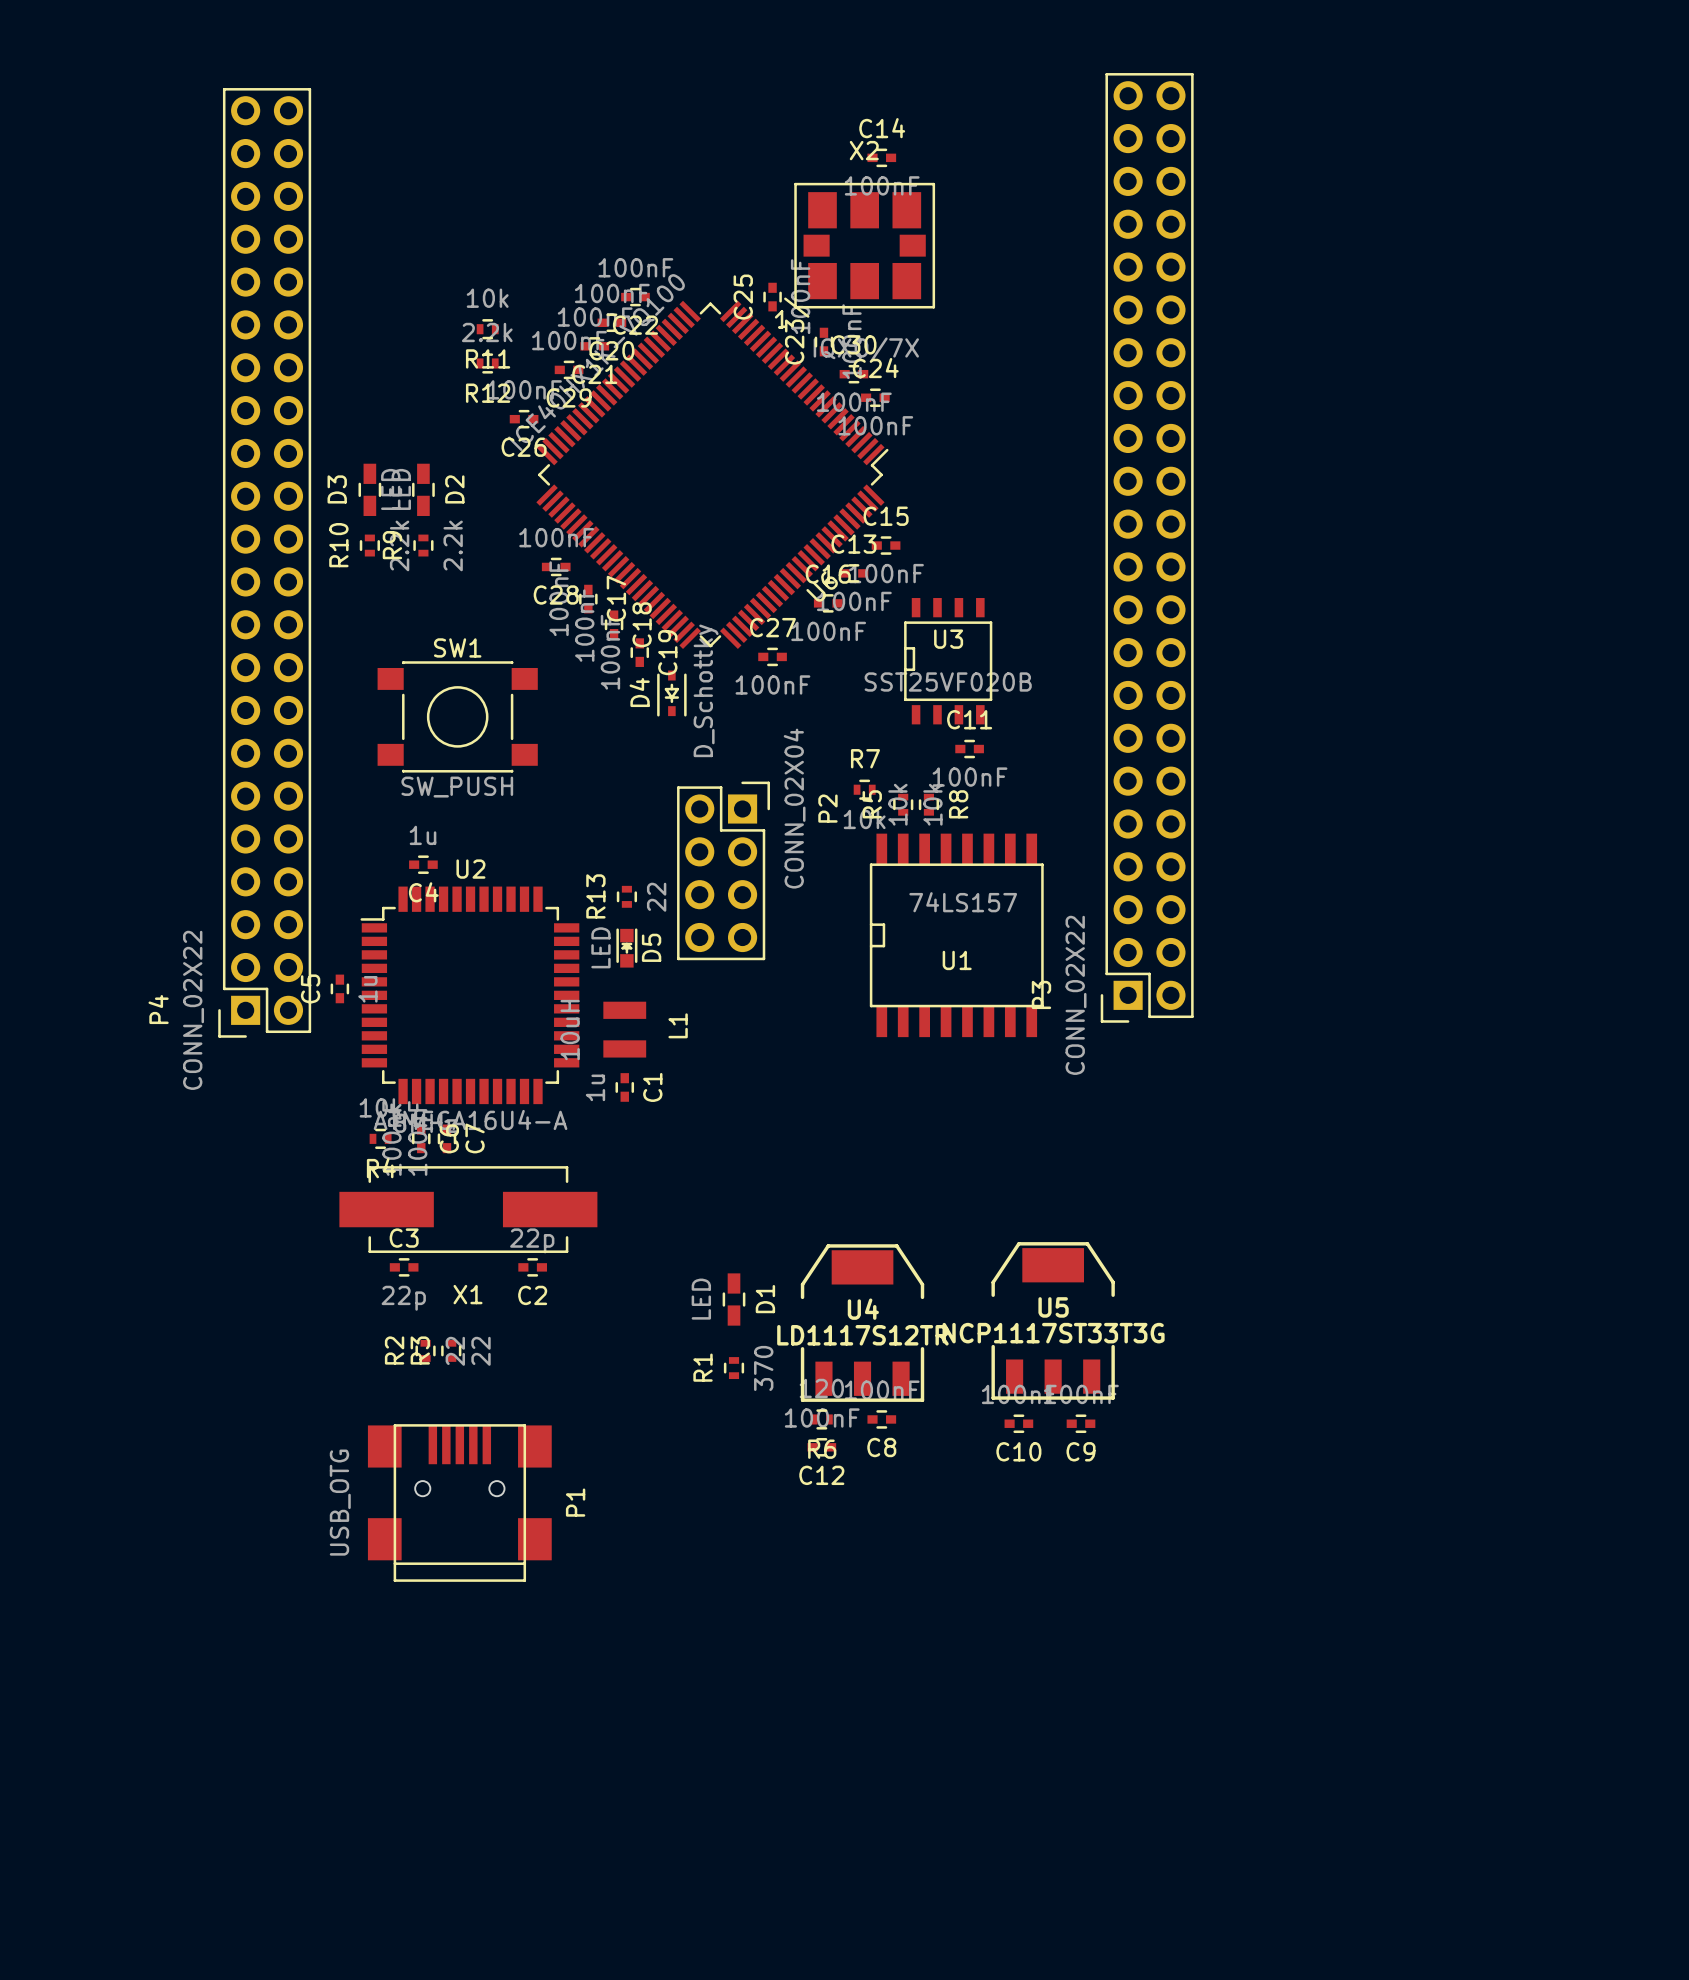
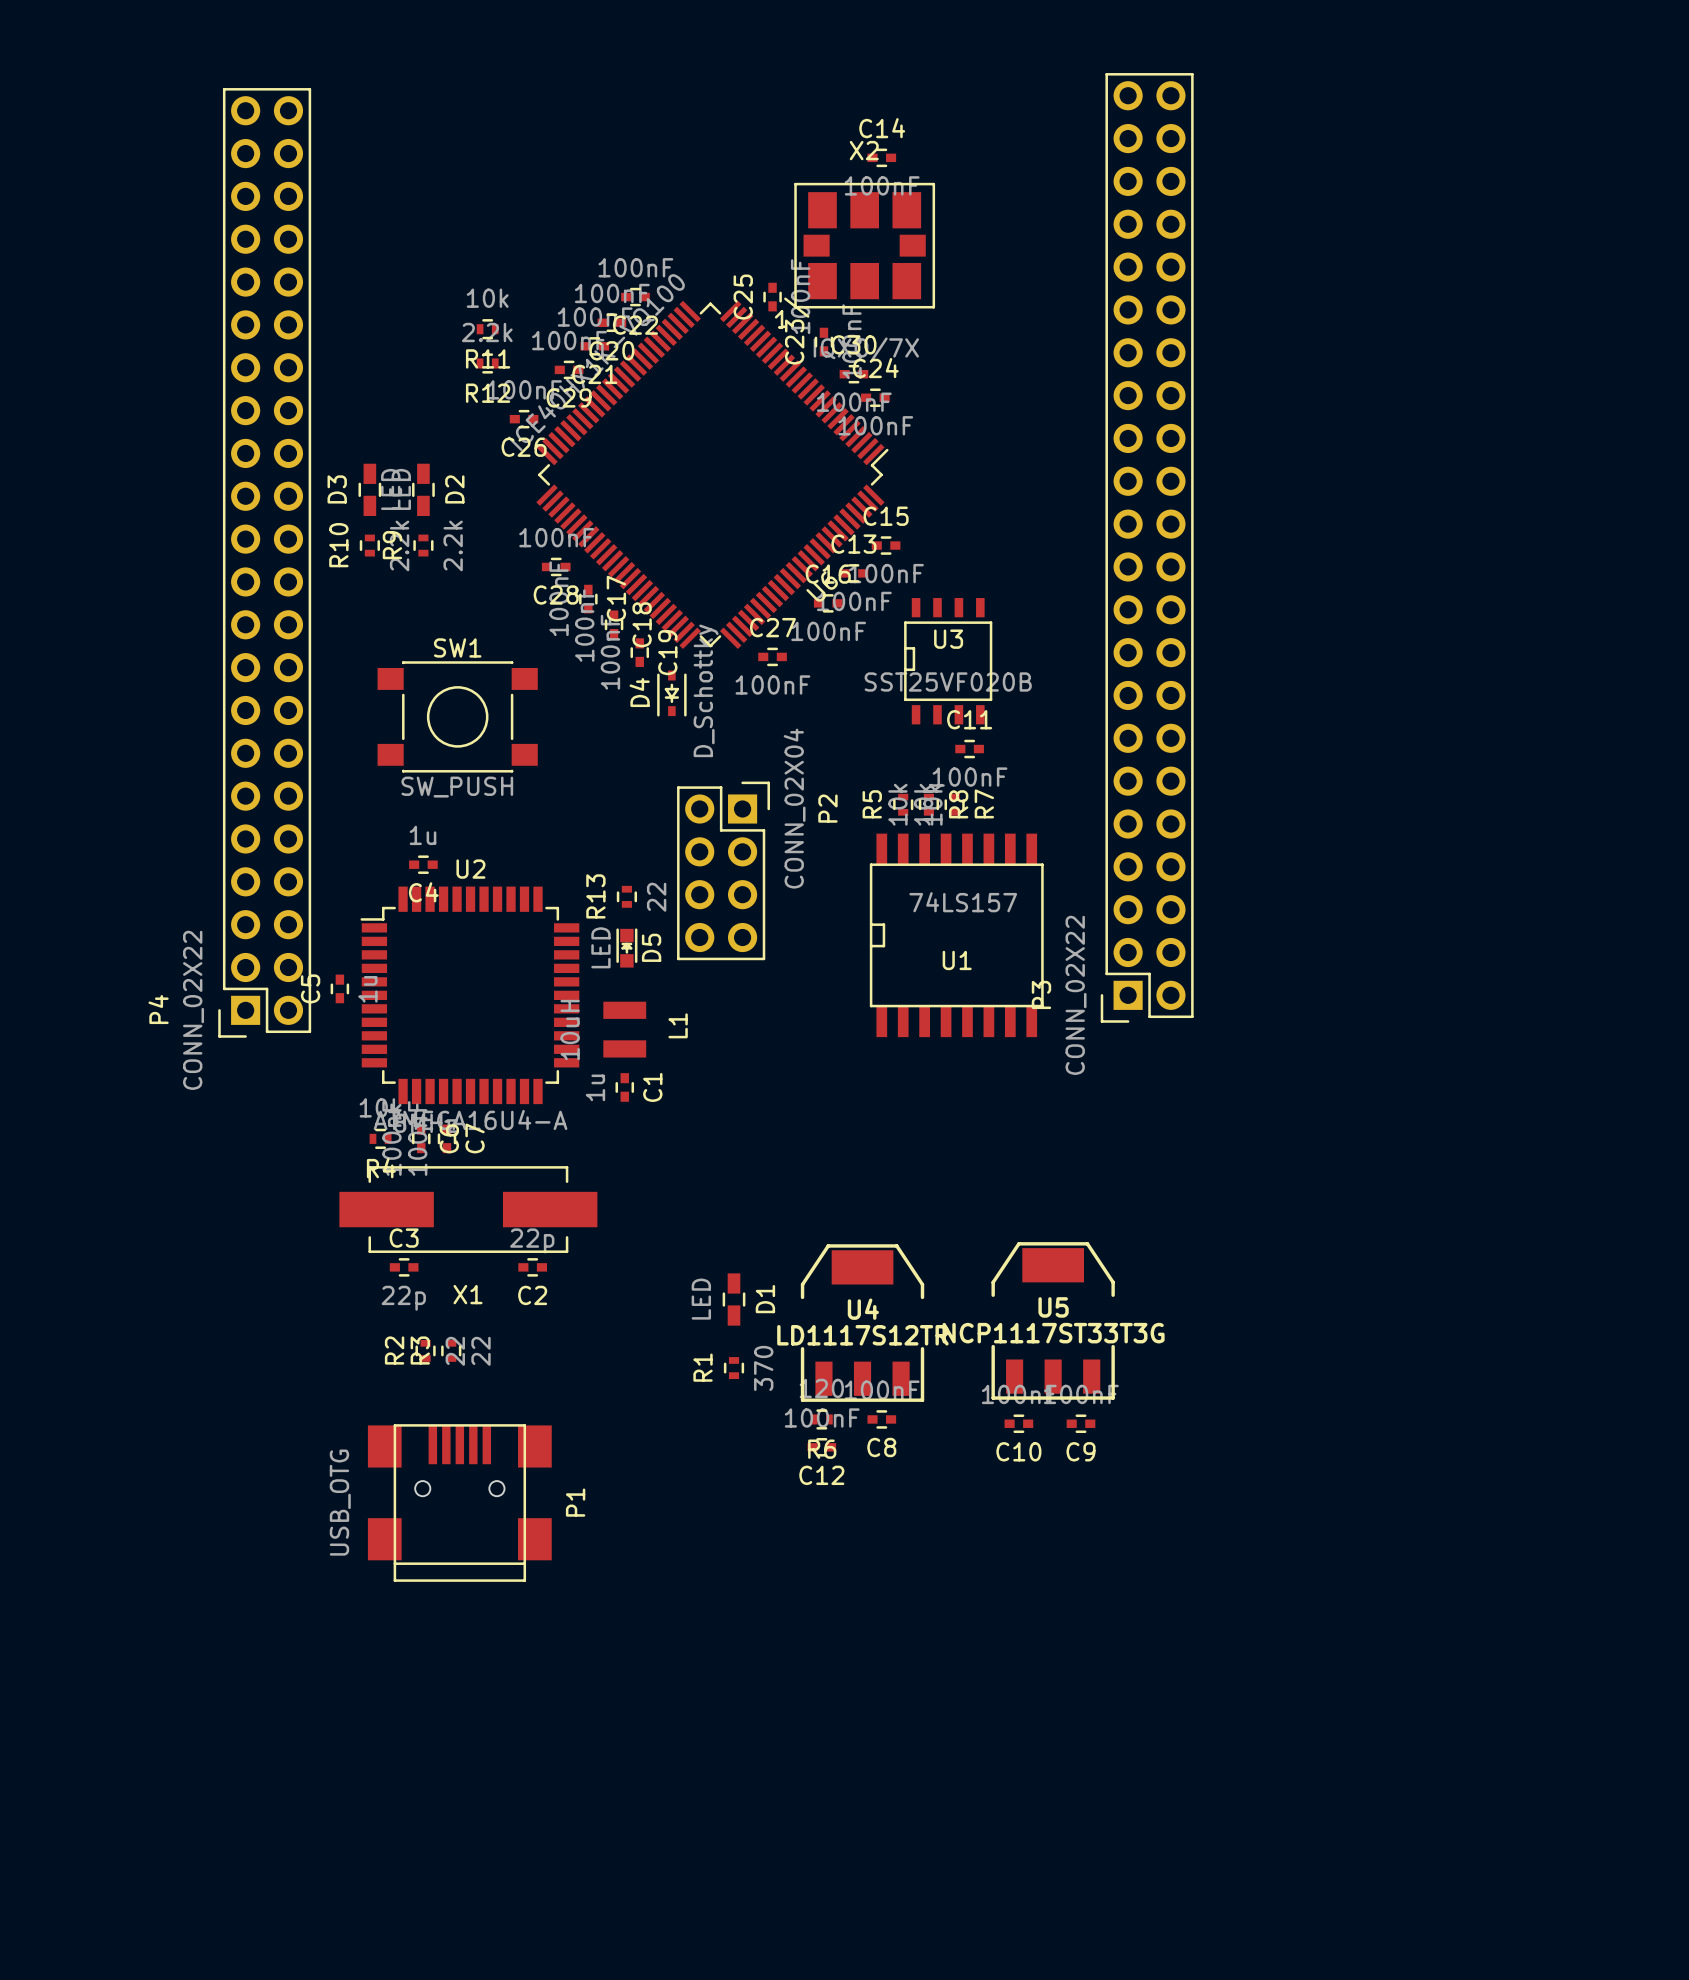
R7 rotation: 0° (864, 789) -> 90° clockwise (954, 804)
R7 position: (864, 789) -> (954, 804)

